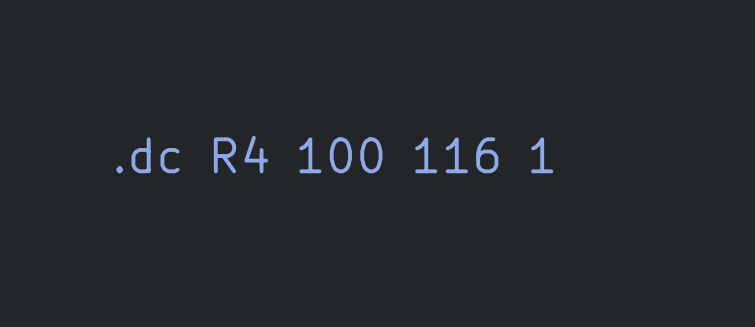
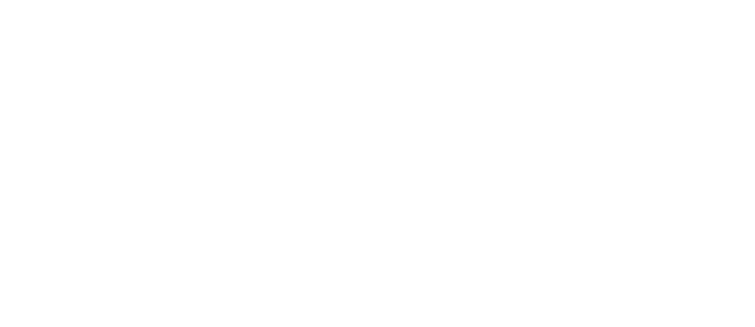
text: .dc R4 100 116 1 (334, 154) -> none

